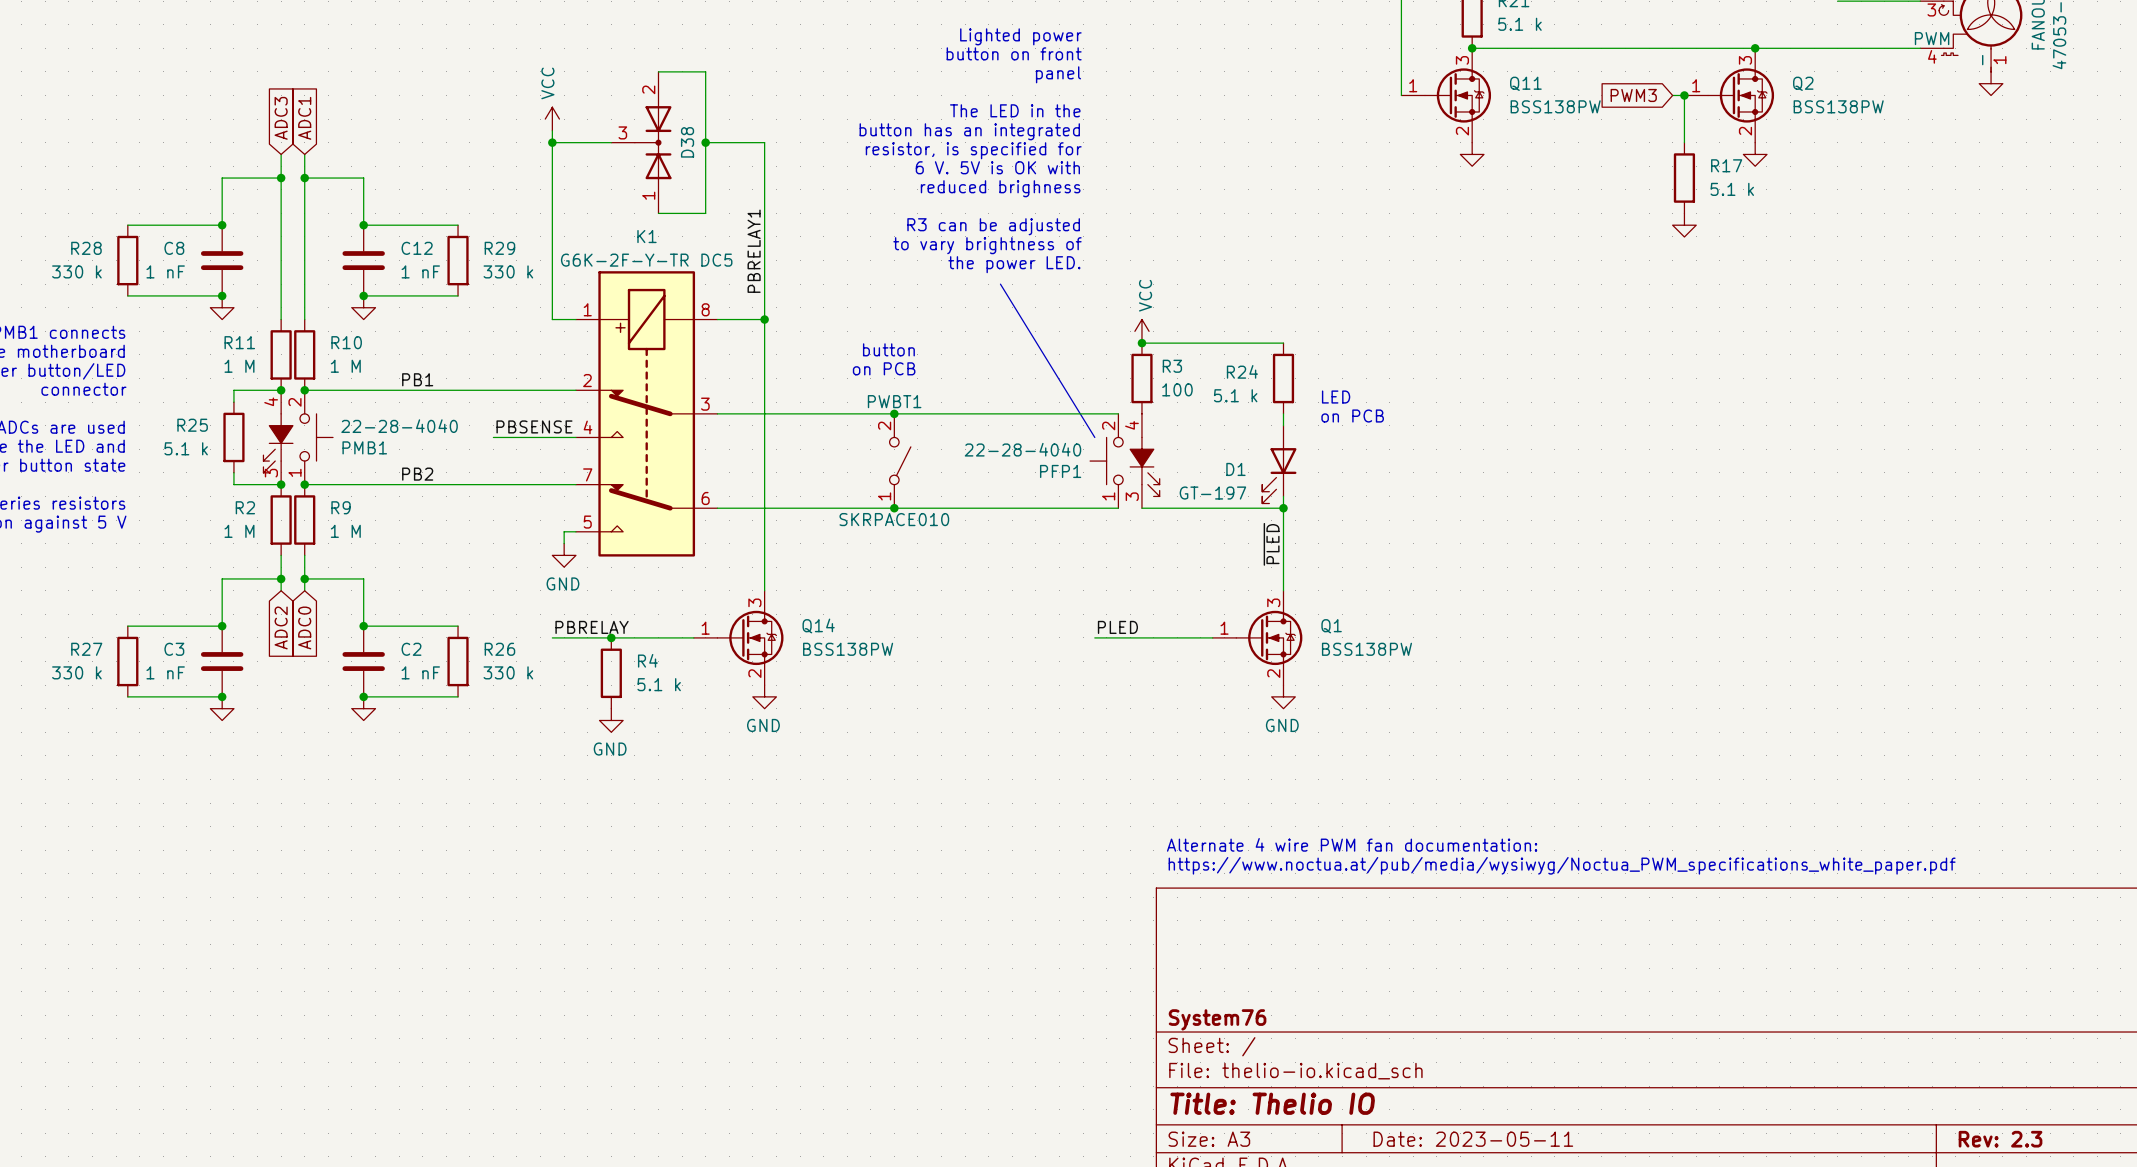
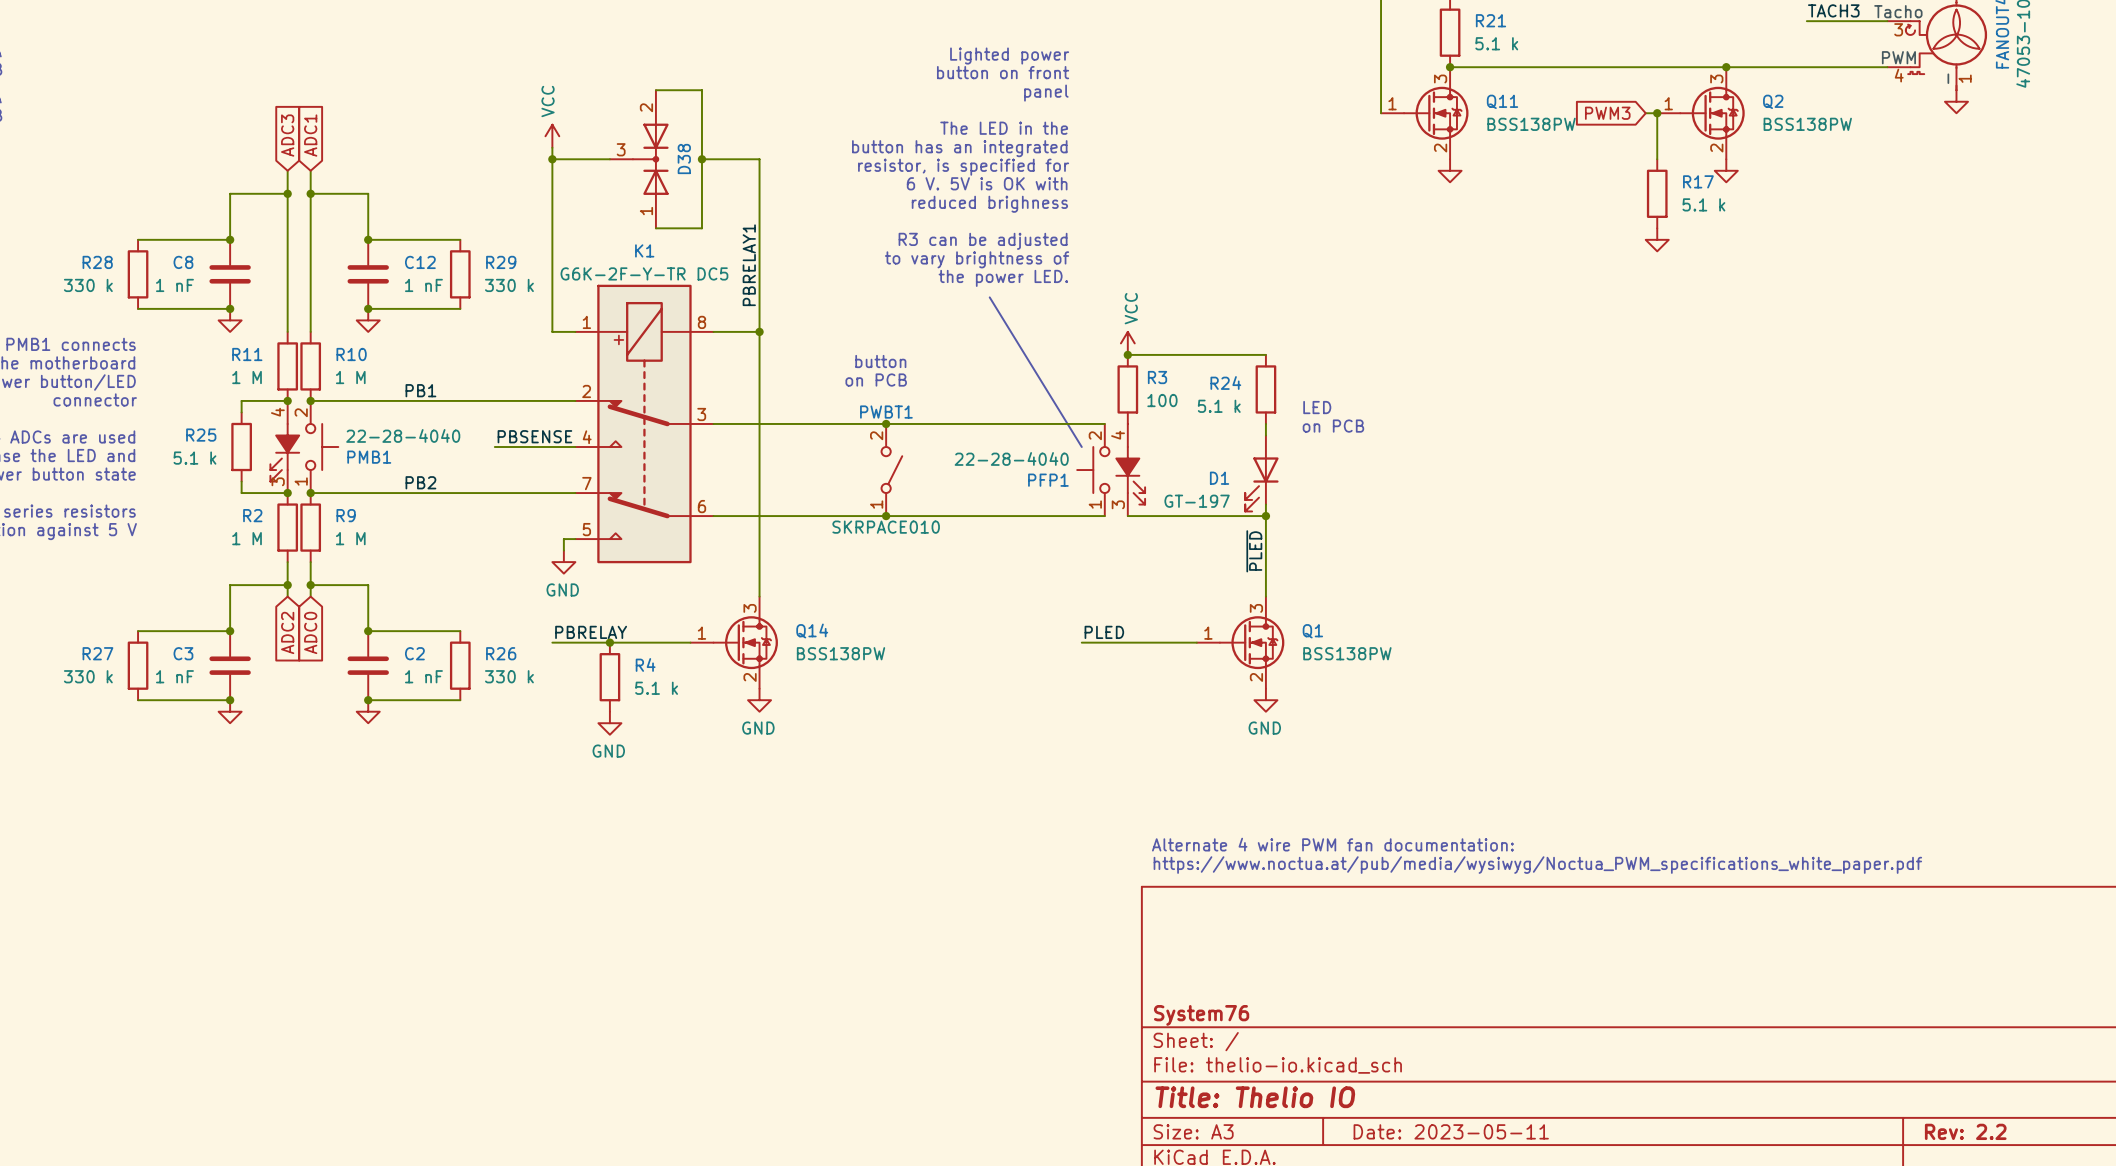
title block: Rev: 2.3 (2000, 1139) -> Rev: 2.2 (1965, 1131)

